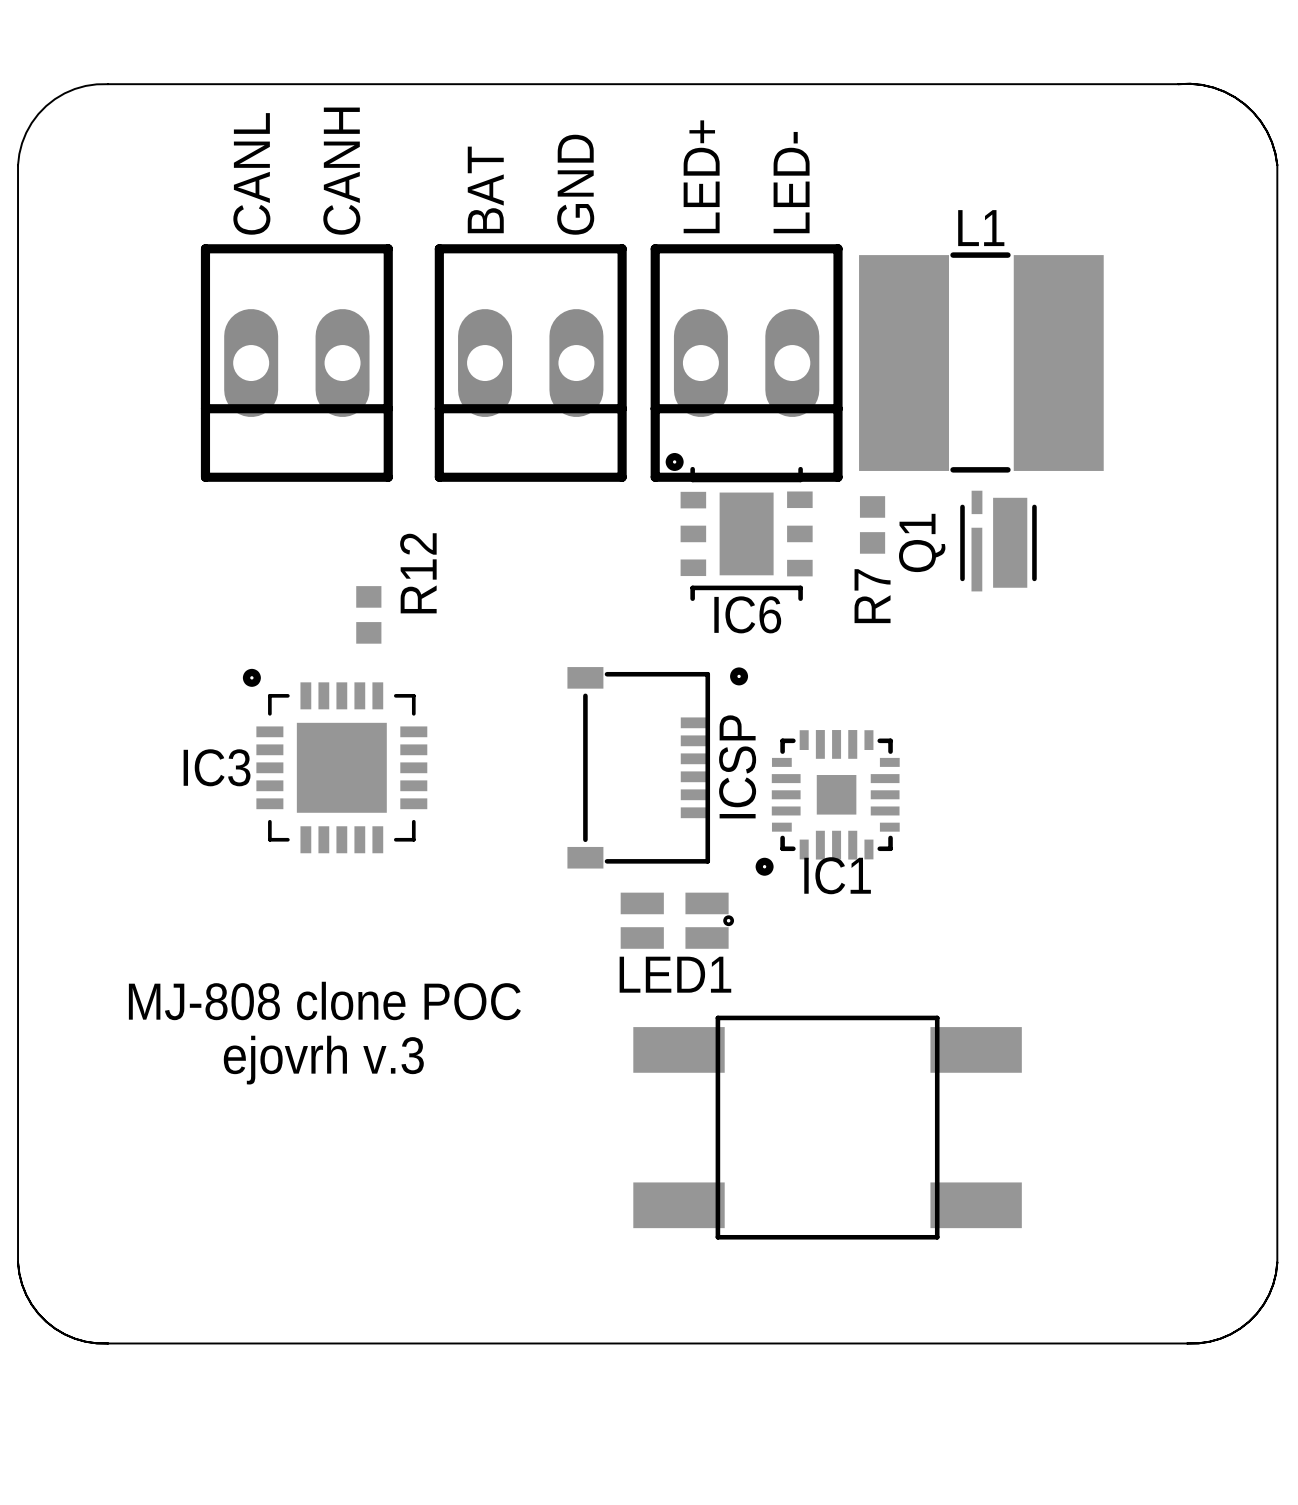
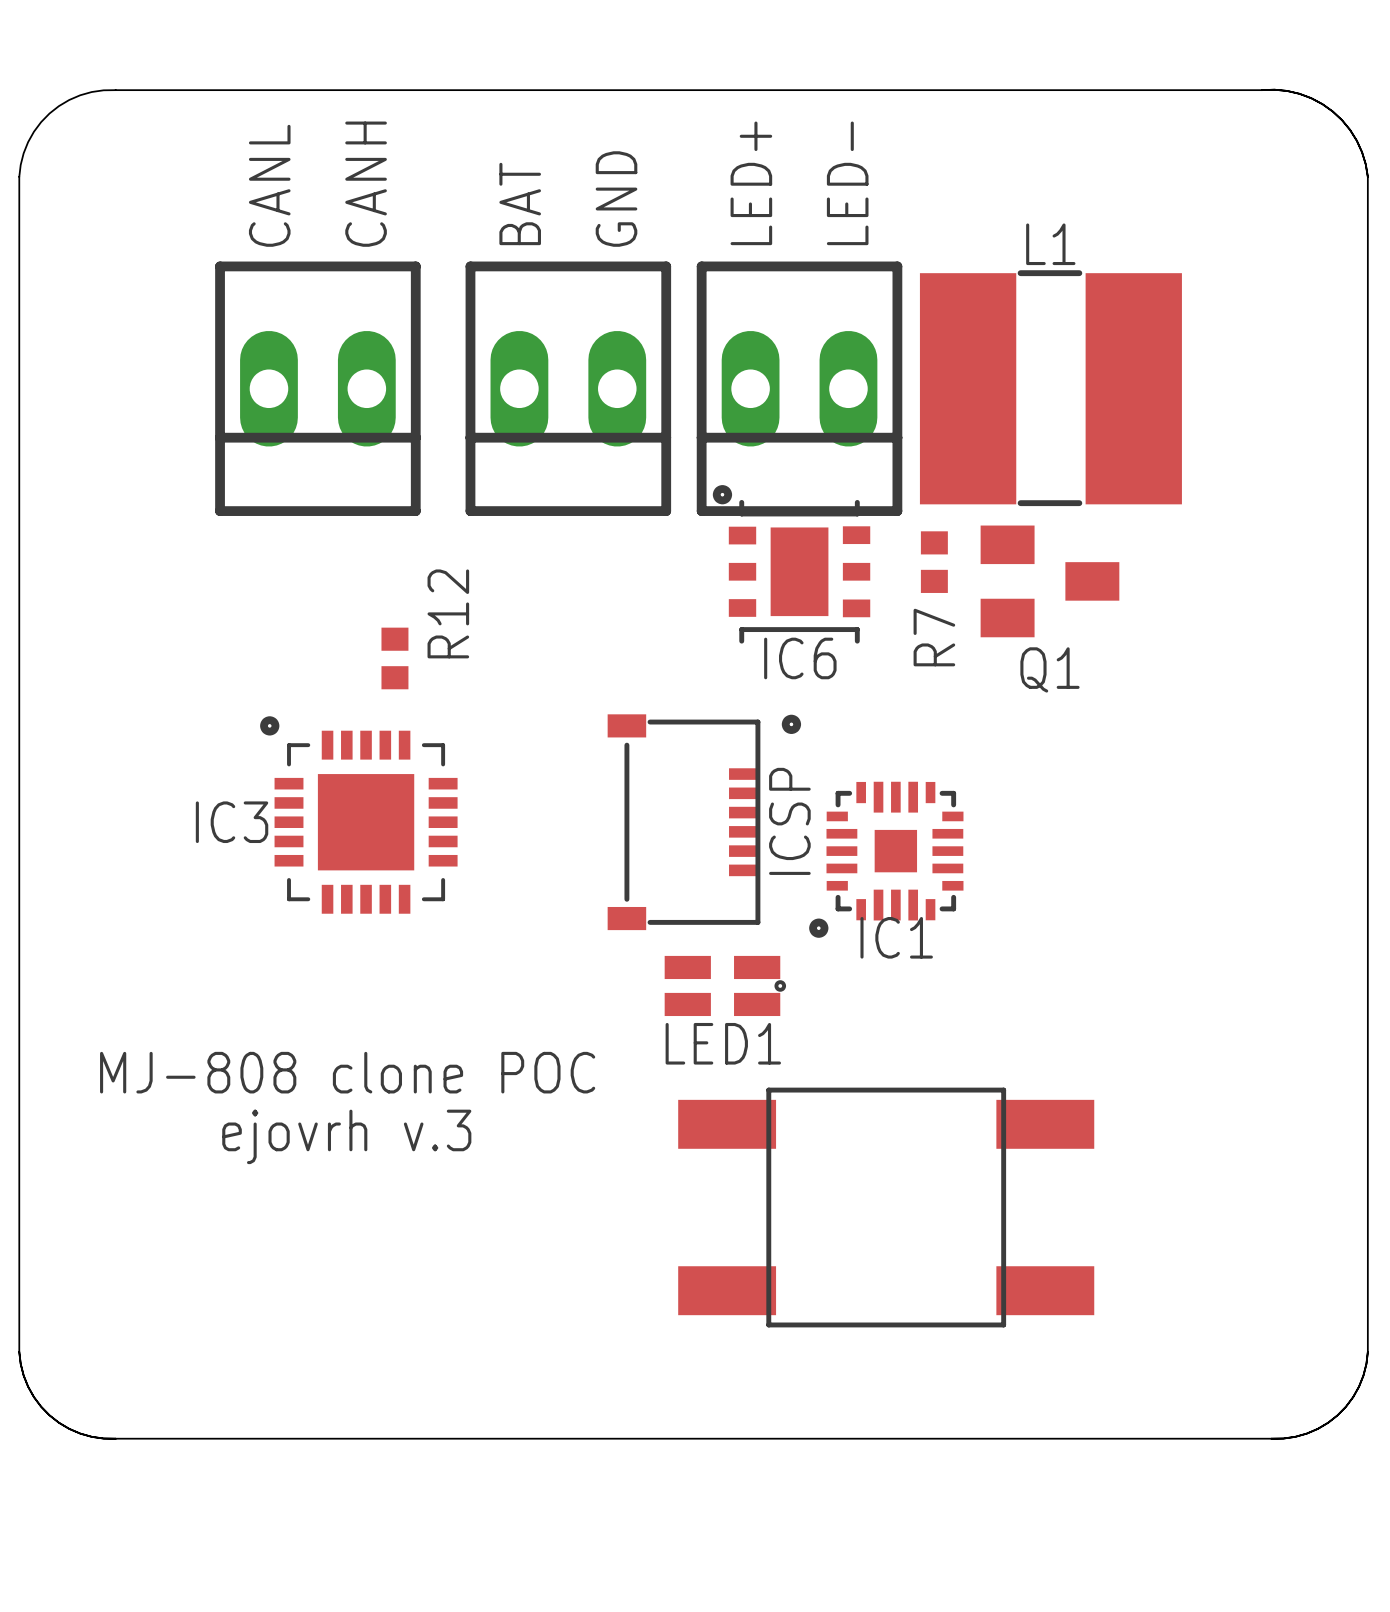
Q1 footprint: [960, 490, 1037, 592] -> [980, 525, 1120, 638]
Q1 name position: Q1 (922, 542) -> Q1 (1049, 669)

